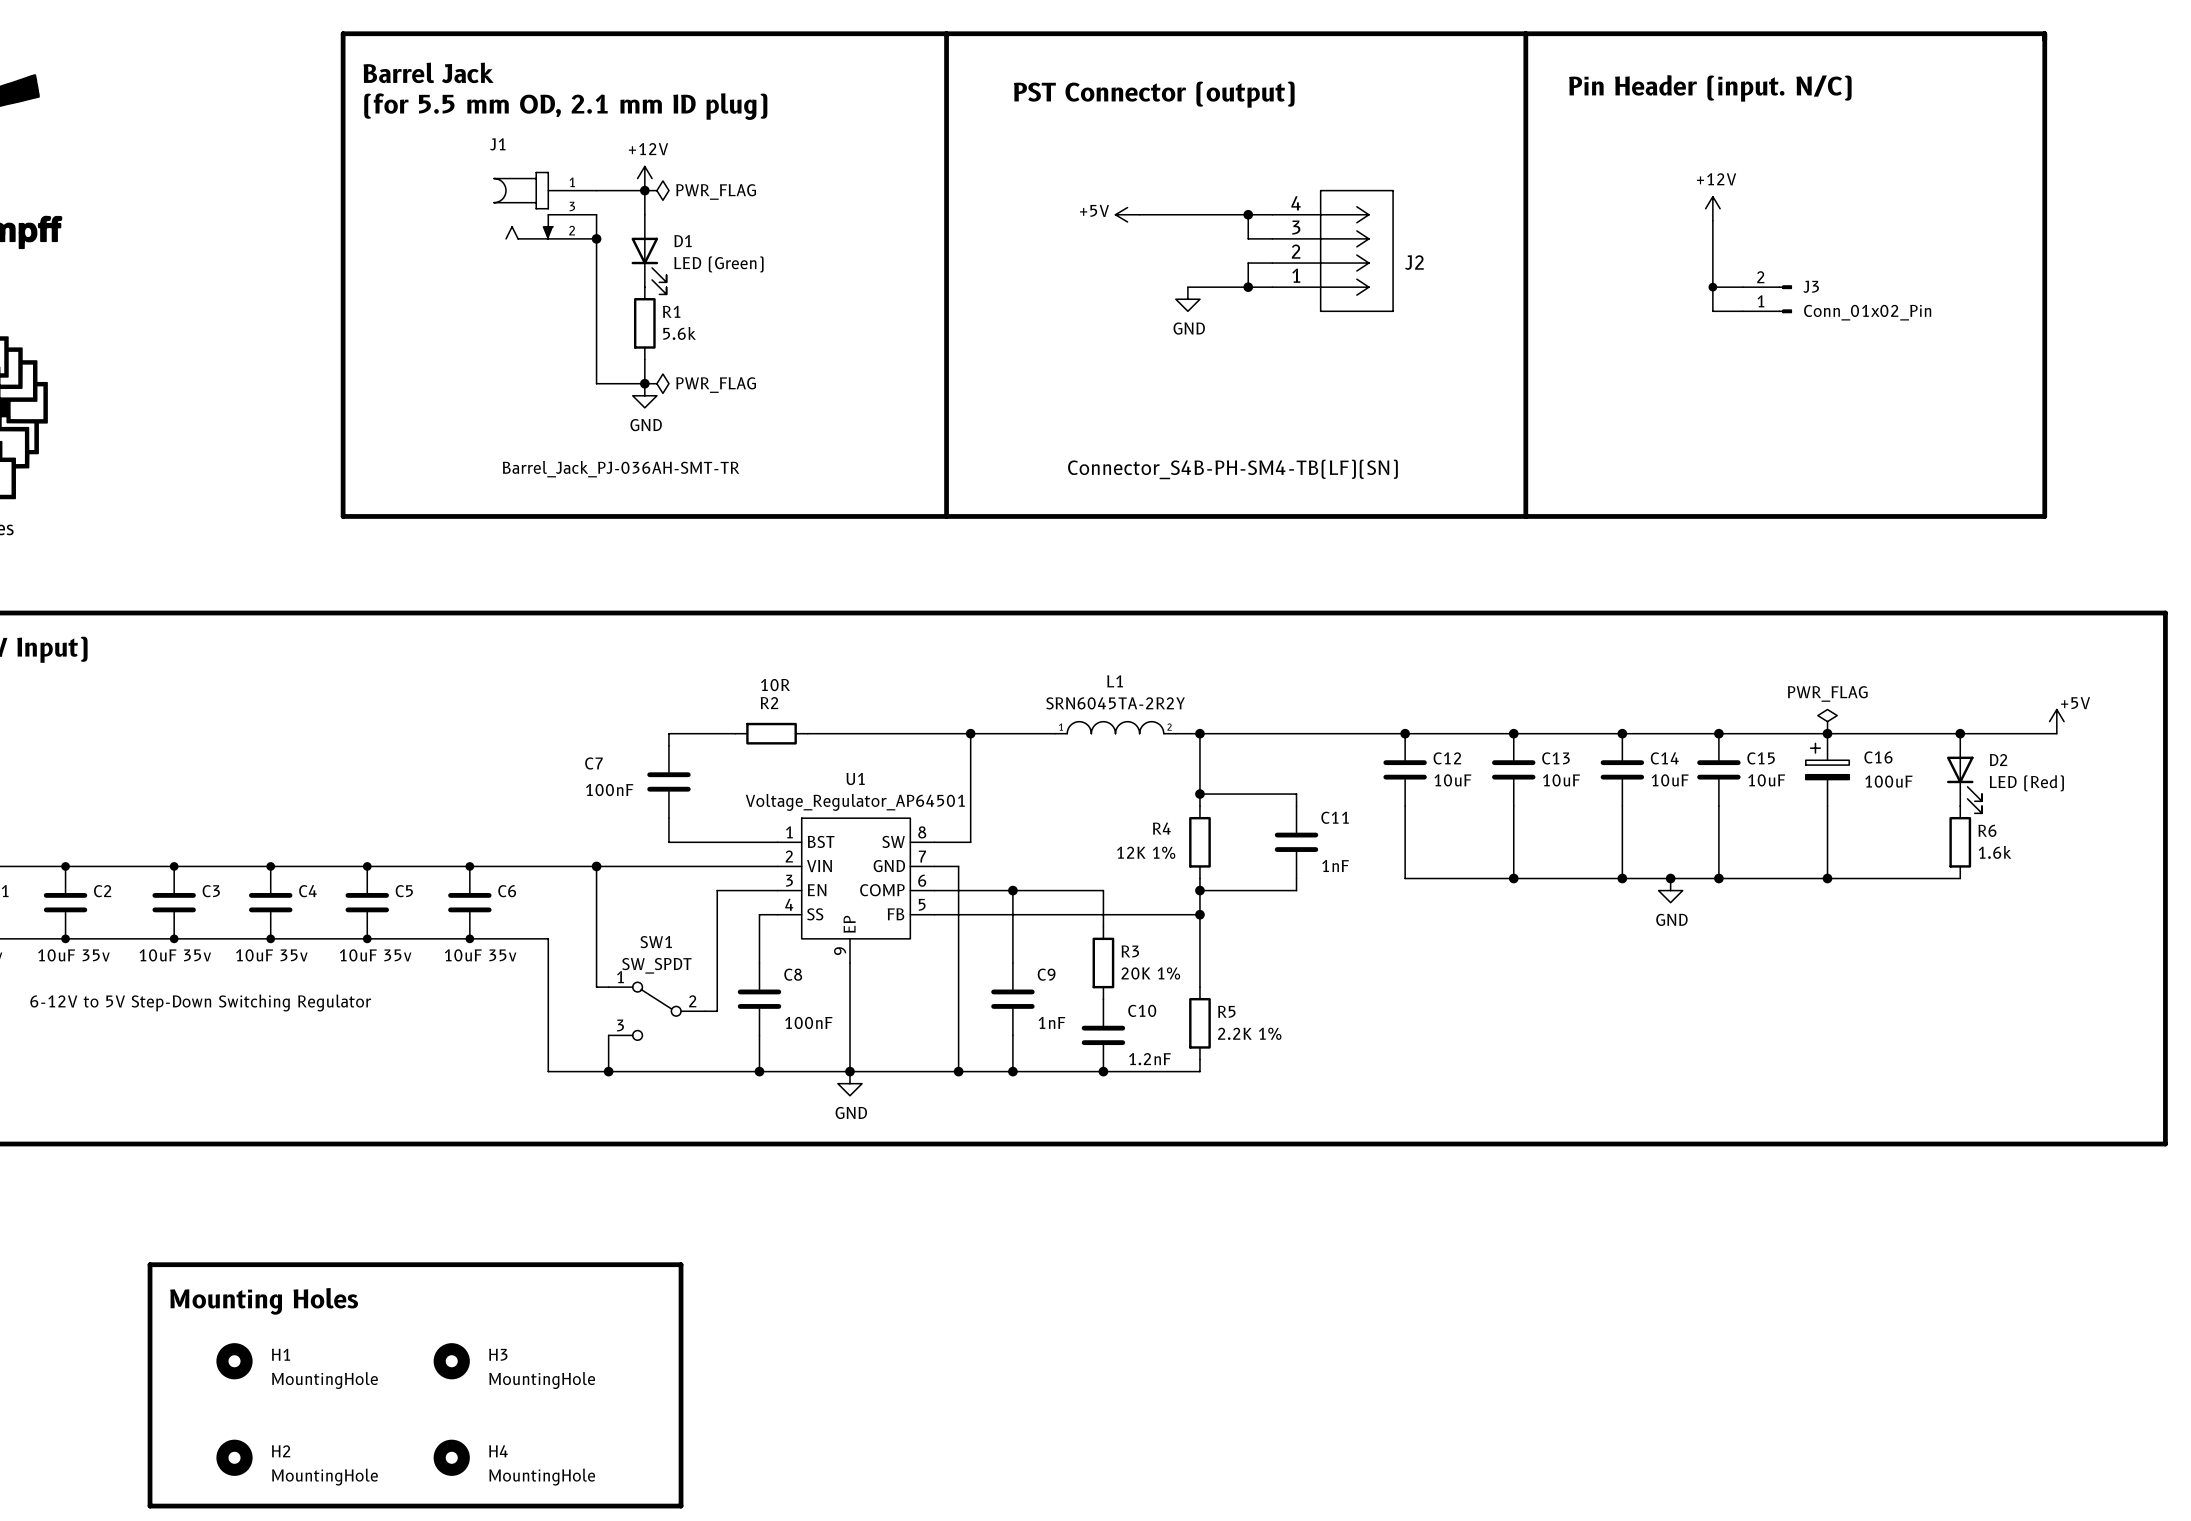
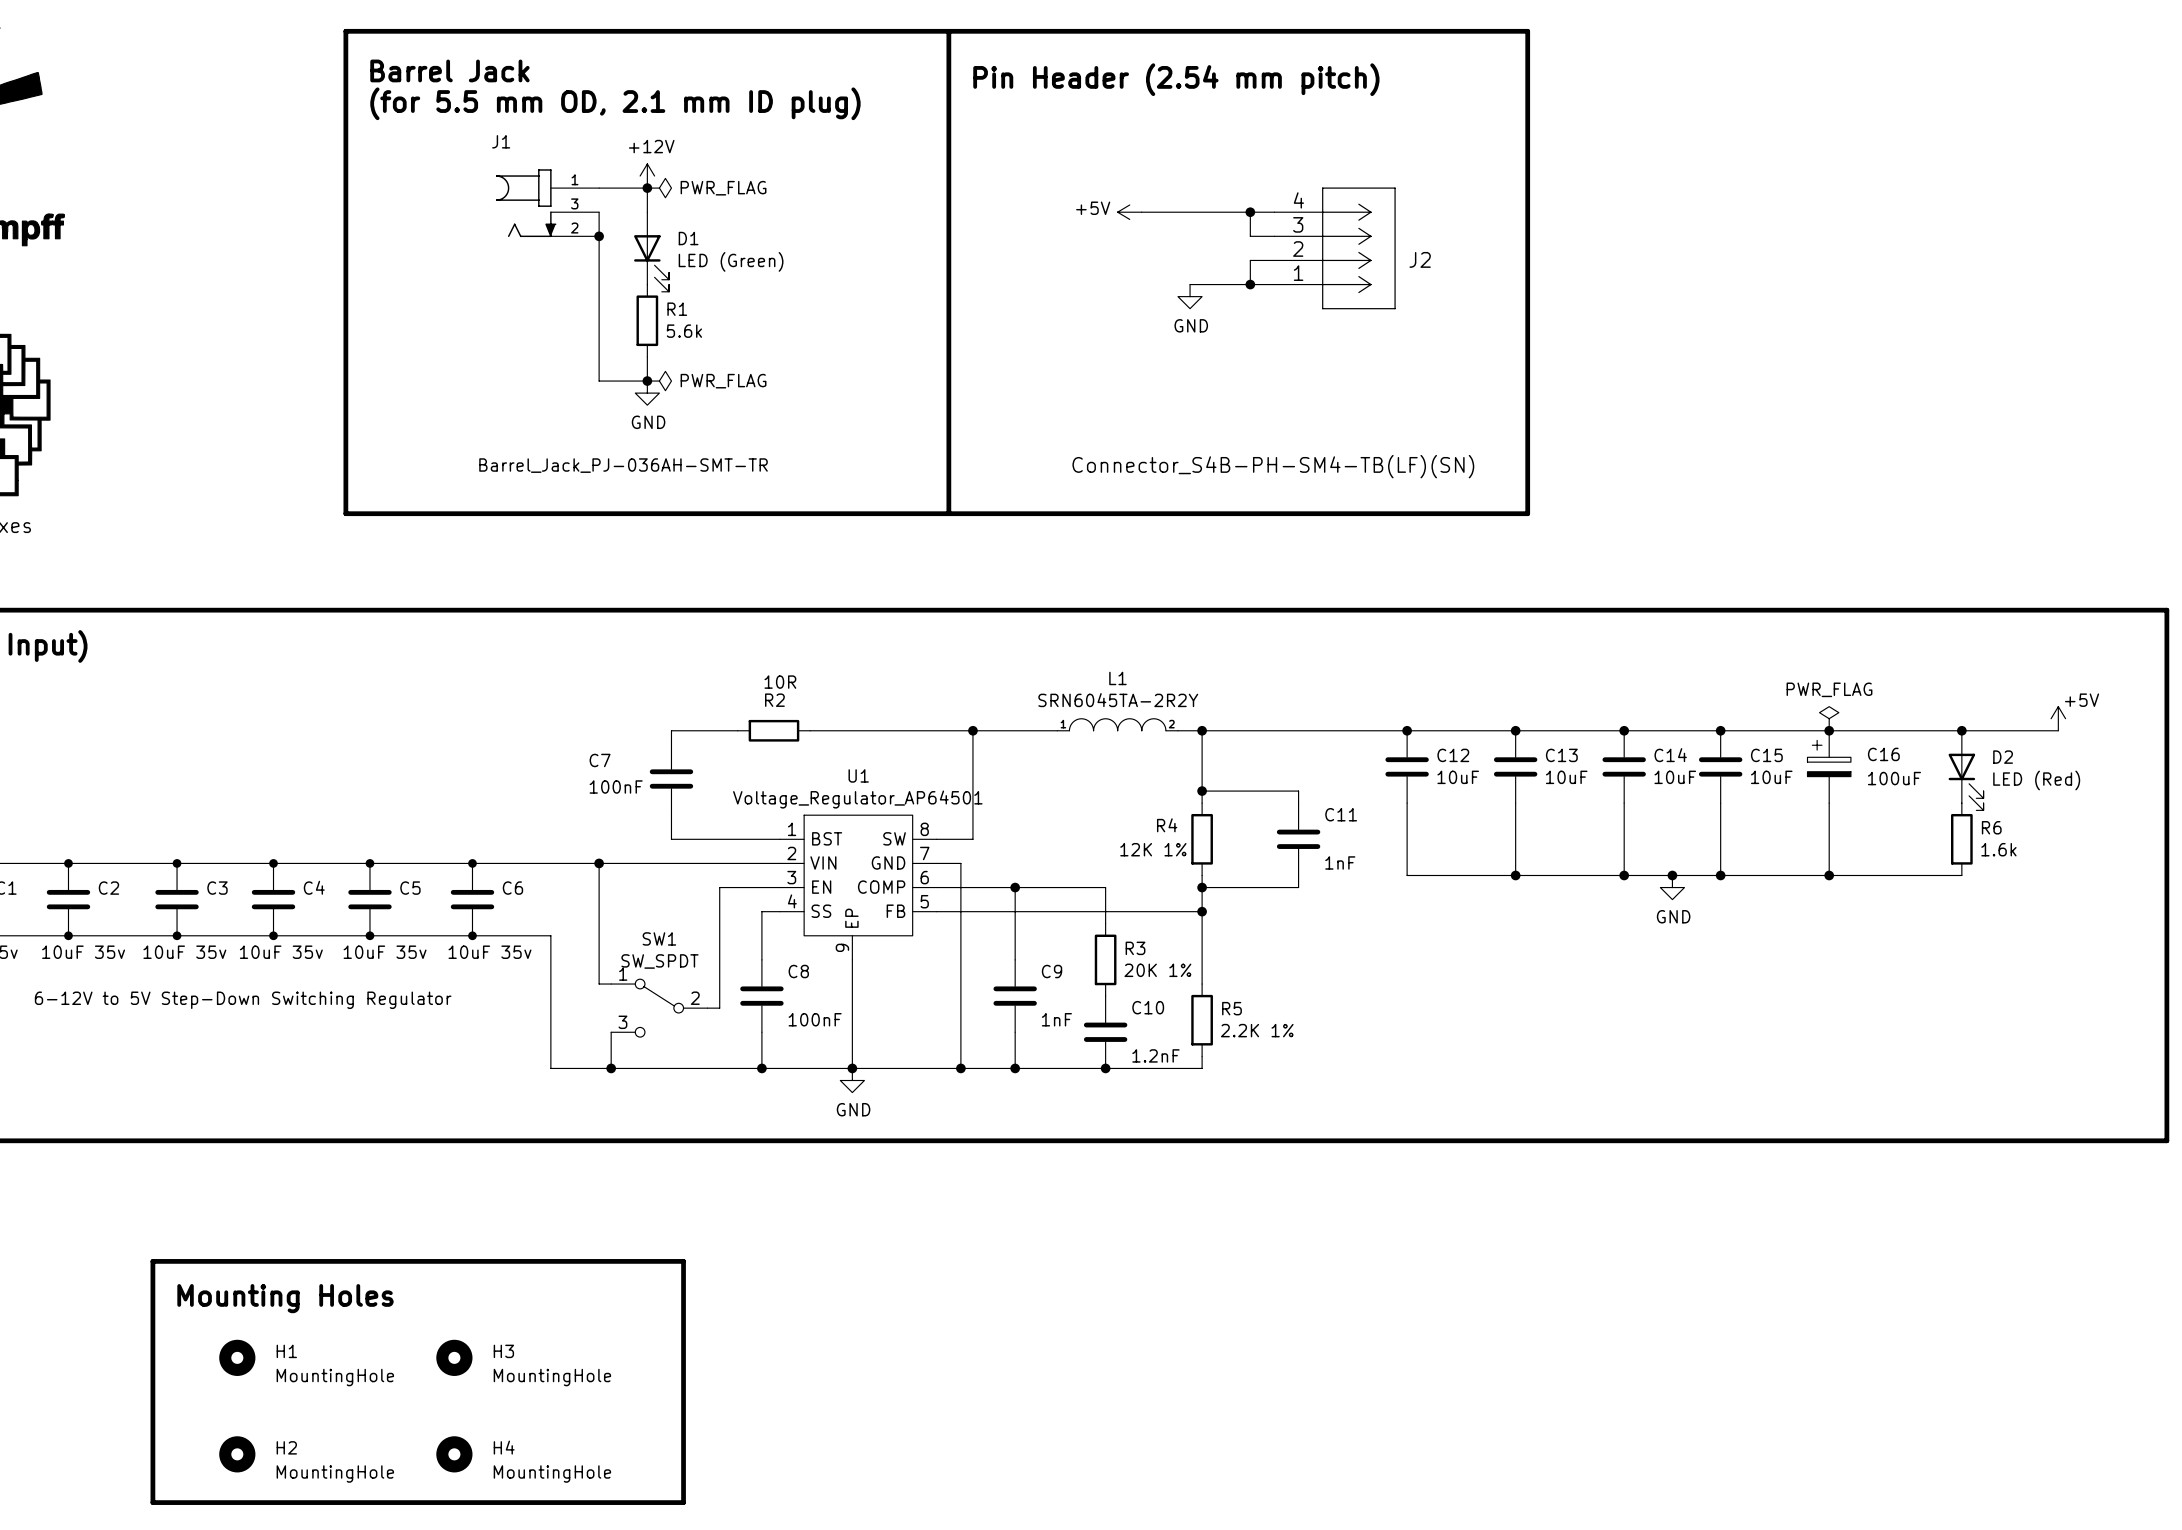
line: (1525, 33) (2044, 33) (2044, 516) (1525, 516) -> none
text: none -> Pin Header (2.54 mm pitch) (1176, 79)
text: Pin Header (input. N/C) (1710, 88) -> none
text: PST Connector (output) (1154, 94) -> none
power symbol: +12V (1712, 208) -> none
wire: (1712, 220) (1712, 311) (1743, 311) -> none
wire: (1712, 287) (1743, 287) -> none
junction: (1712, 287) -> none
J3: Conn_01x02_Pin (1767, 299) -> none

